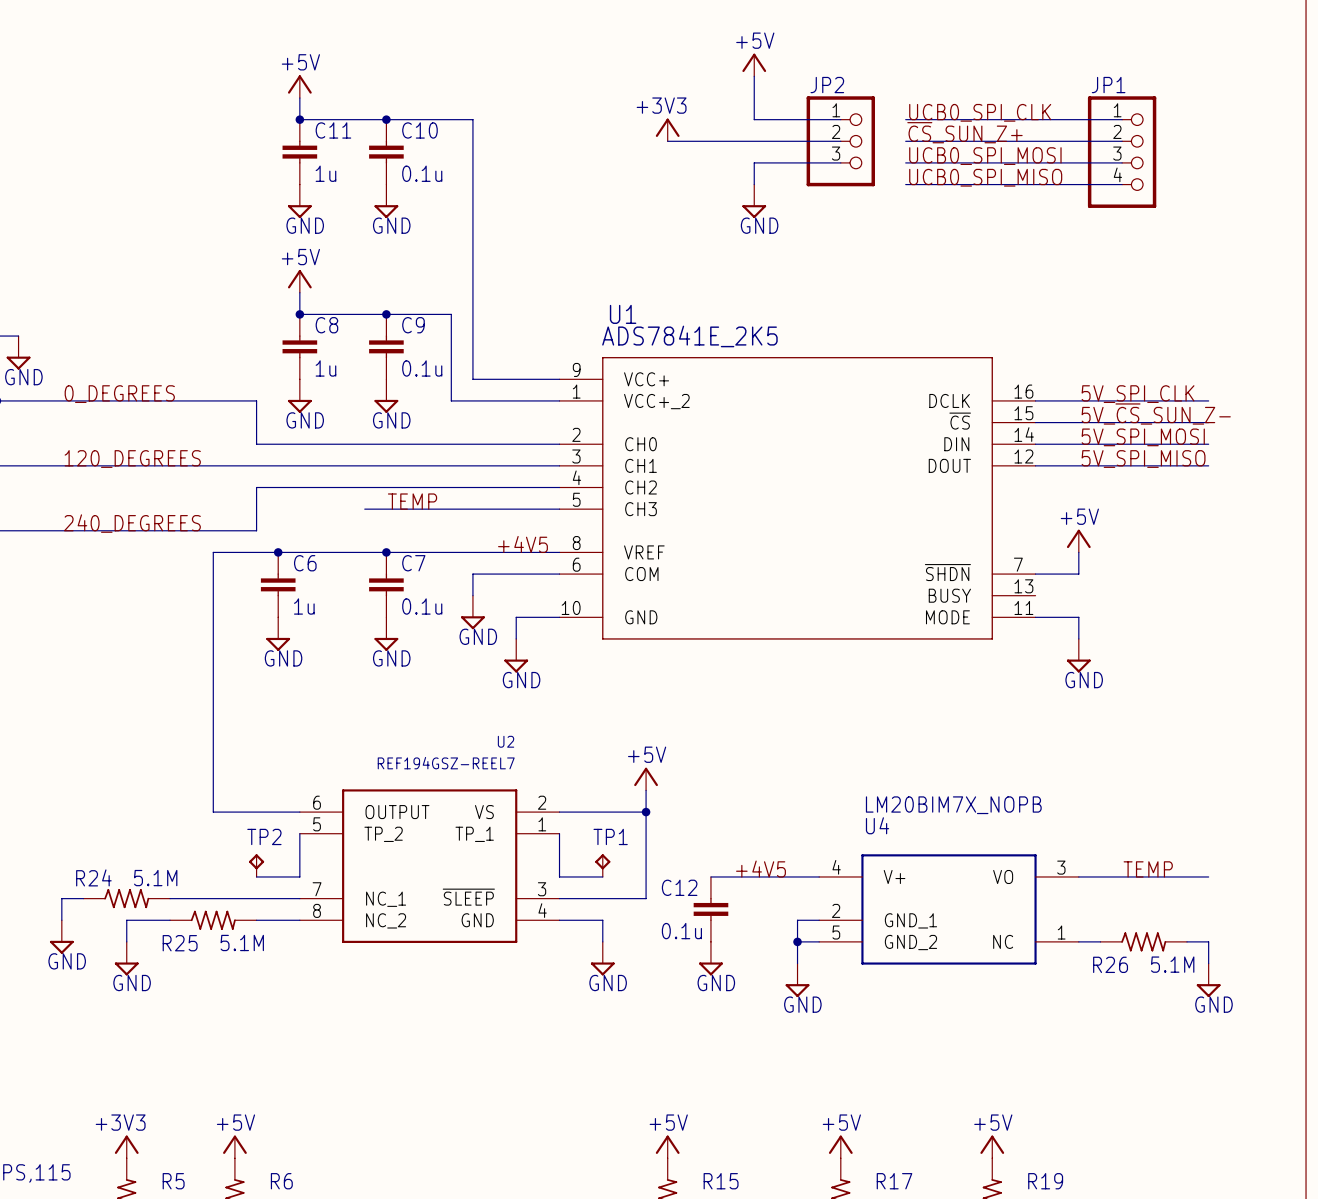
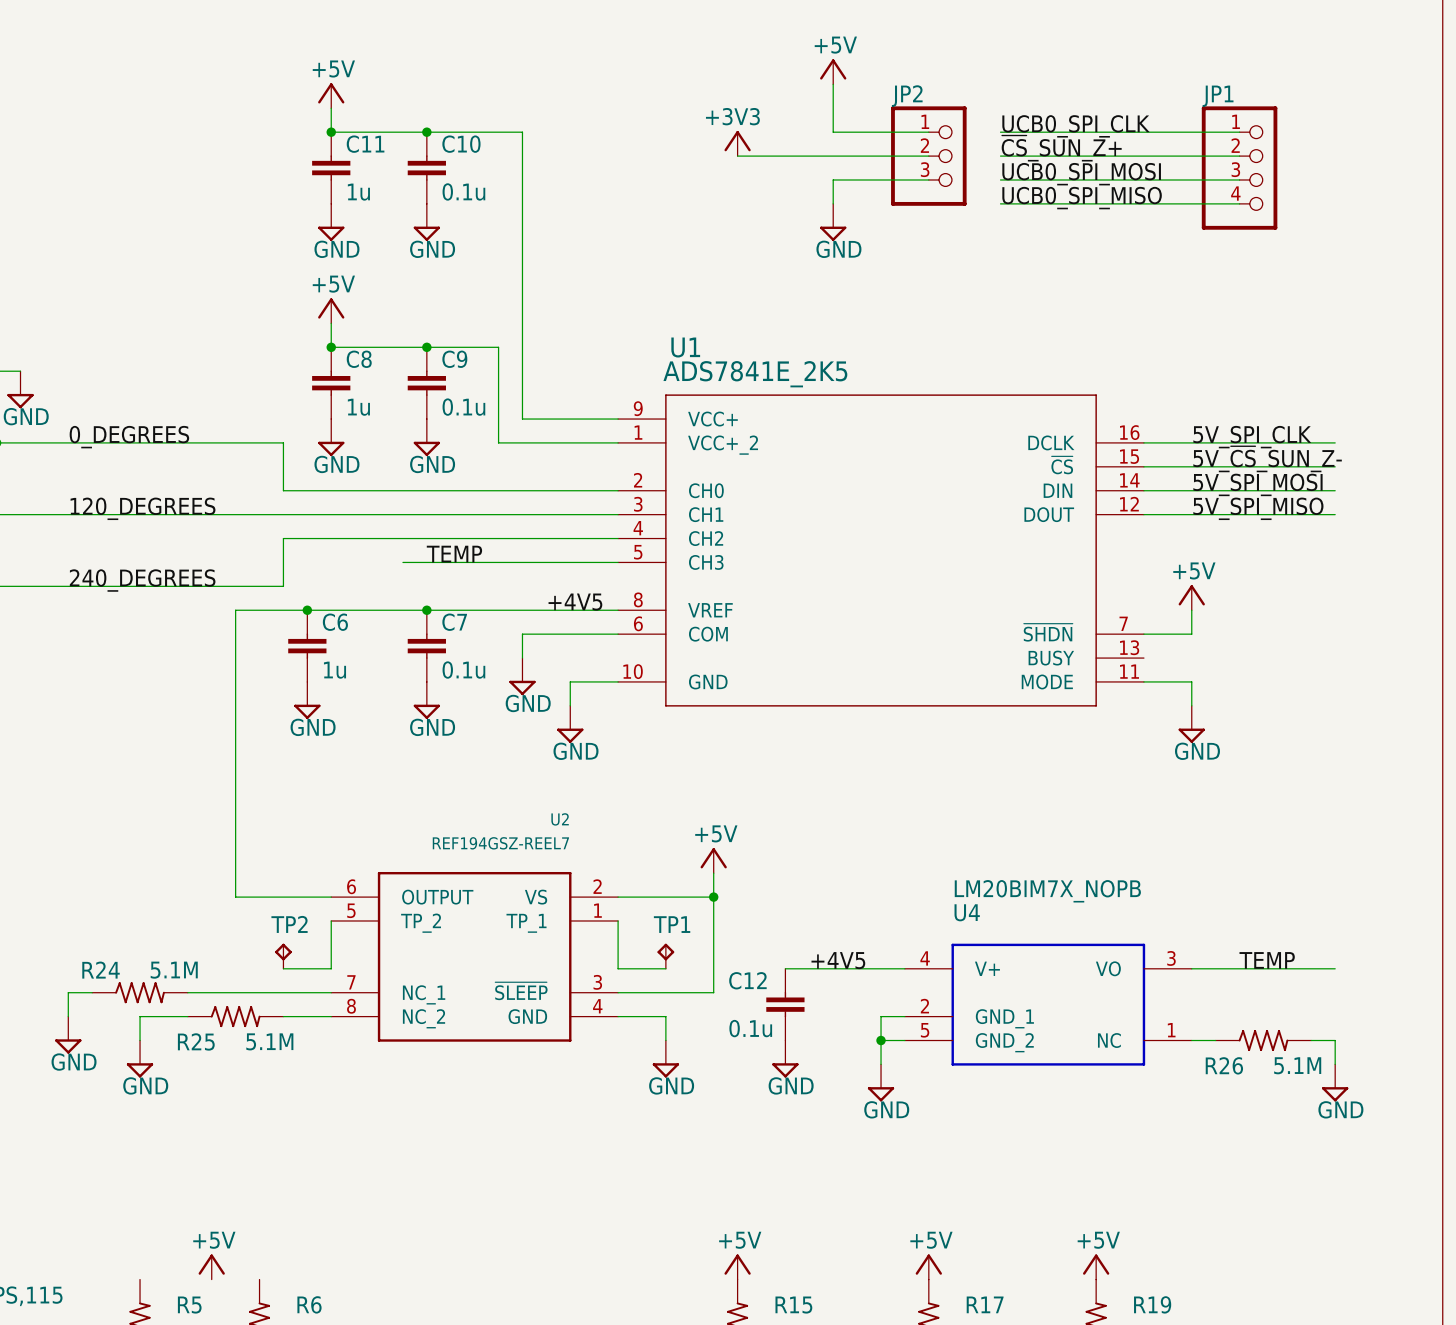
power symbol: +3V3 (126, 1146) -> none
power symbol position: +5V (234, 1146) -> +5V (211, 1266)

